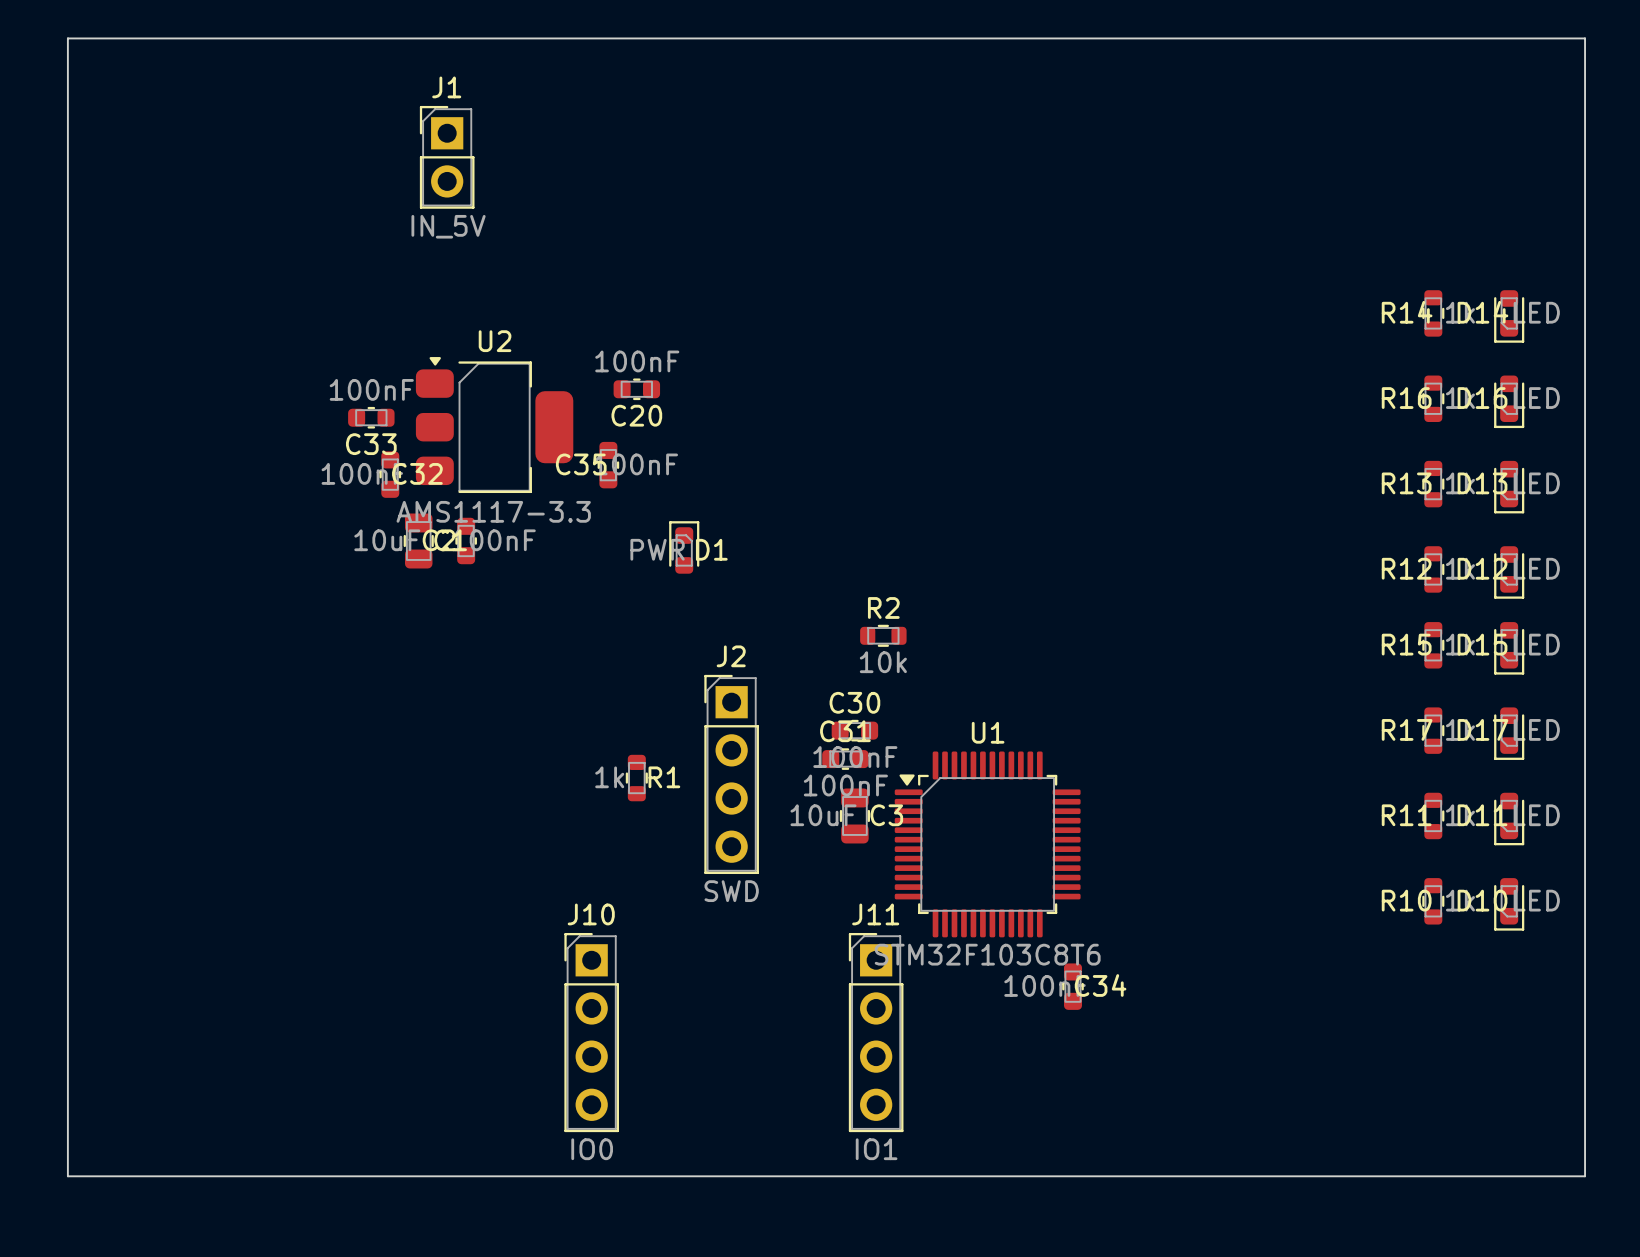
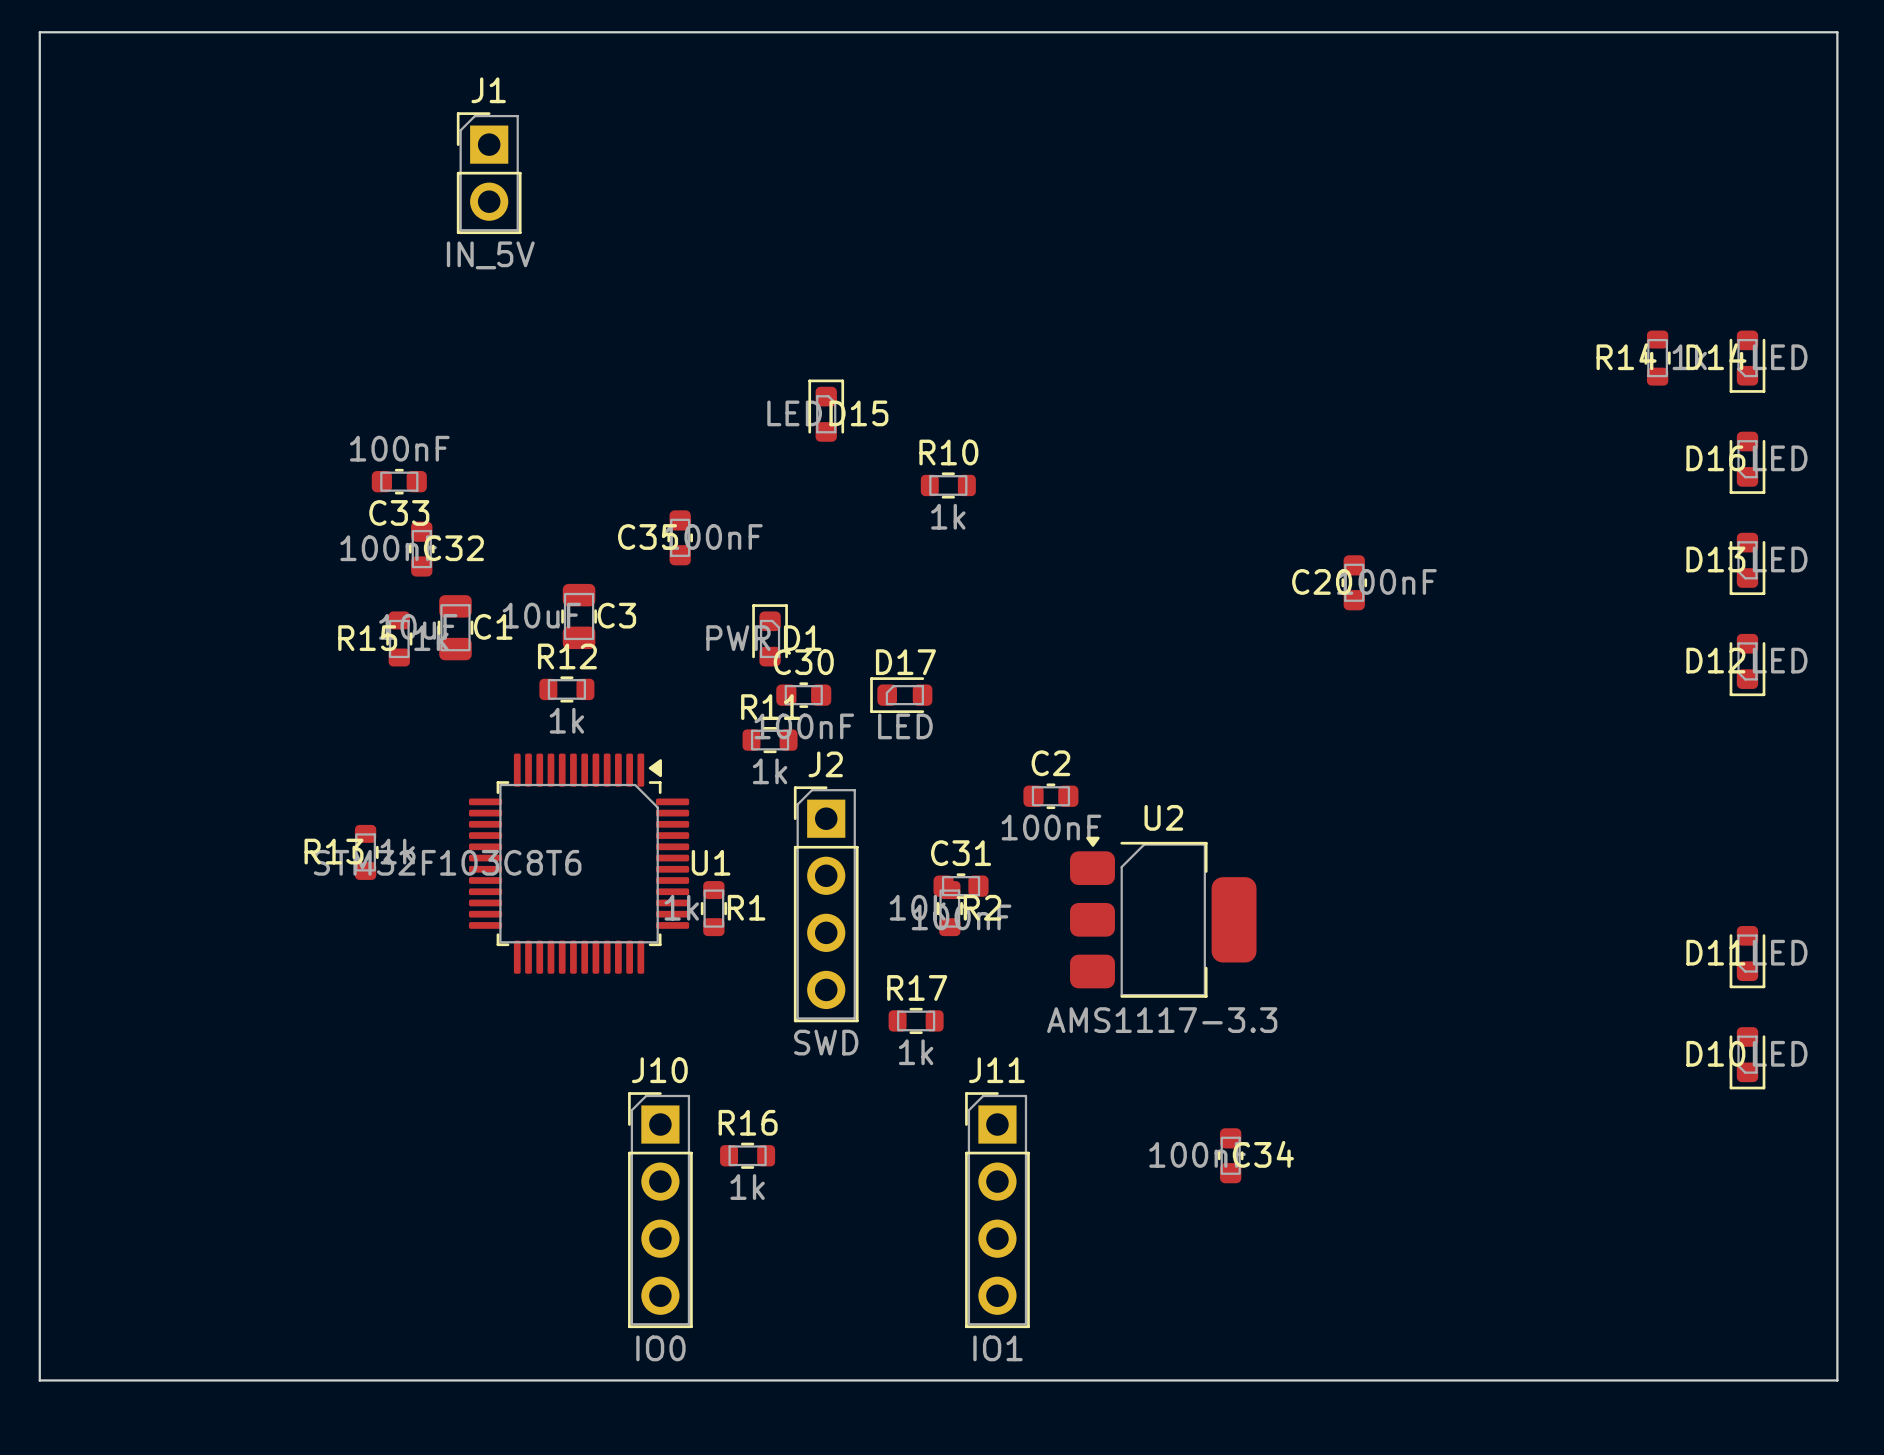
C20 rotation: 0° (636, 389) -> 90° clockwise (1354, 582)
C20 position: (636, 389) -> (1354, 582)
R16 rotation: 0° (1433, 398) -> 90° clockwise (747, 1155)
R16 position: (1433, 398) -> (747, 1155)
U2 position: (494, 425) -> (1163, 917)
R13 position: (1433, 484) -> (365, 852)
C2 rotation: 0° (466, 540) -> 90° clockwise (1050, 796)
C2 position: (466, 540) -> (1050, 796)
R12 rotation: 0° (1433, 569) -> 90° clockwise (566, 689)
R12 position: (1433, 569) -> (566, 689)
R2 rotation: 0° (883, 635) -> 90° clockwise (949, 908)
R2 position: (883, 635) -> (949, 908)
R15 position: (1433, 645) -> (399, 638)
D15 rotation: 0° (1509, 648) -> 180° (826, 410)
D15 position: (1509, 648) -> (826, 410)
C30 position: (854, 730) -> (803, 695)
R17 rotation: 0° (1433, 730) -> 90° clockwise (916, 1020)
R17 position: (1433, 730) -> (916, 1020)
D17 rotation: 0° (1509, 733) -> 90° clockwise (901, 695)
D17 position: (1509, 733) -> (901, 695)
C3 position: (854, 815) -> (579, 616)
R11 rotation: 0° (1433, 815) -> 90° clockwise (770, 740)
R11 position: (1433, 815) -> (770, 740)
U1 rotation: 0° (987, 844) -> 90° clockwise (579, 863)
U1 position: (987, 844) -> (579, 863)
R10 rotation: 0° (1433, 901) -> 90° clockwise (948, 485)
R10 position: (1433, 901) -> (948, 485)

